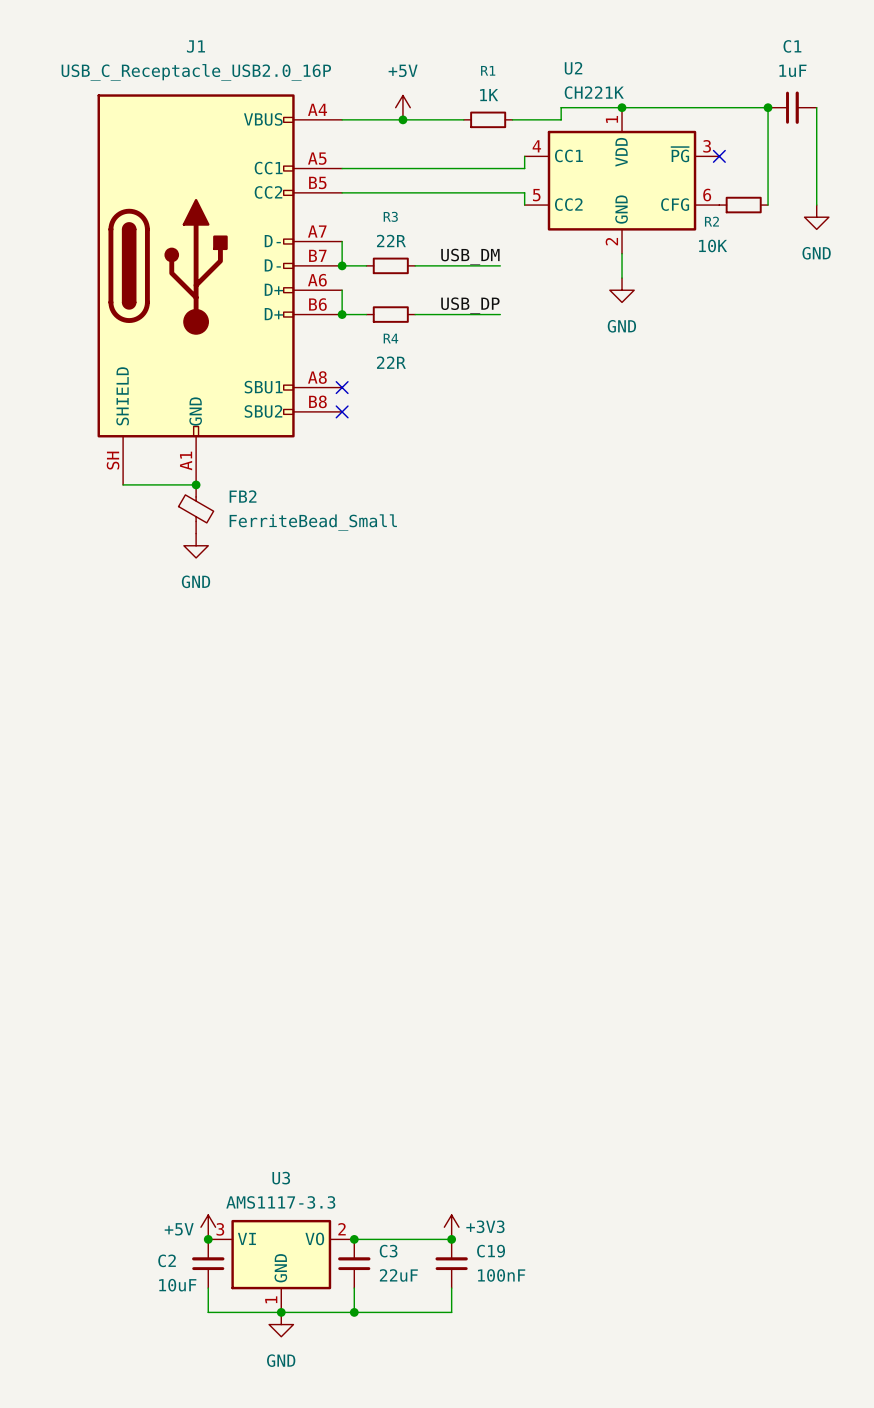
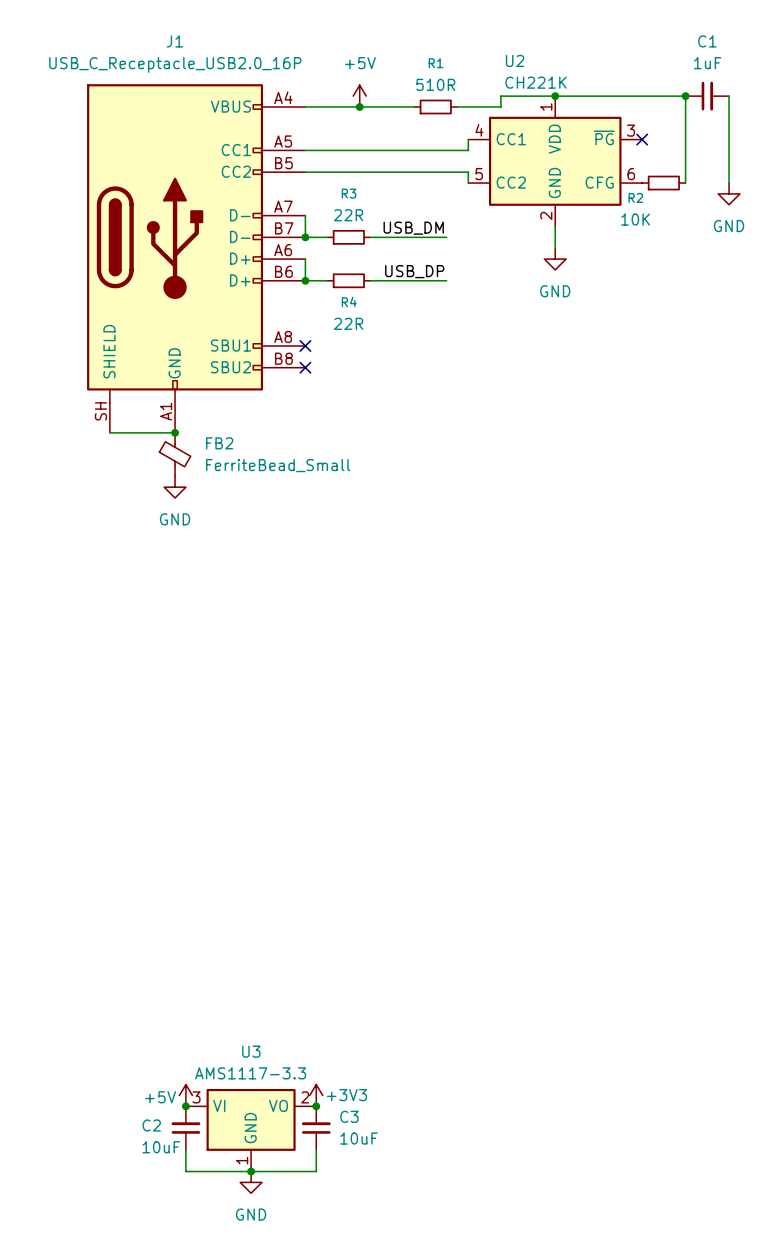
R1 value: 1K (489, 95) -> 510R (435, 84)
power symbol position: +3V3 (451, 1227) -> +3V3 (316, 1095)
wire: (354, 1239) (451, 1239) -> none
junction: (451, 1239) -> none
C19: 100nF (451, 1263) -> none
C3 value: 22uF (398, 1275) -> 10uF (359, 1138)
wire: (451, 1288) (451, 1312) (354, 1312) -> none
junction: (354, 1312) -> none

